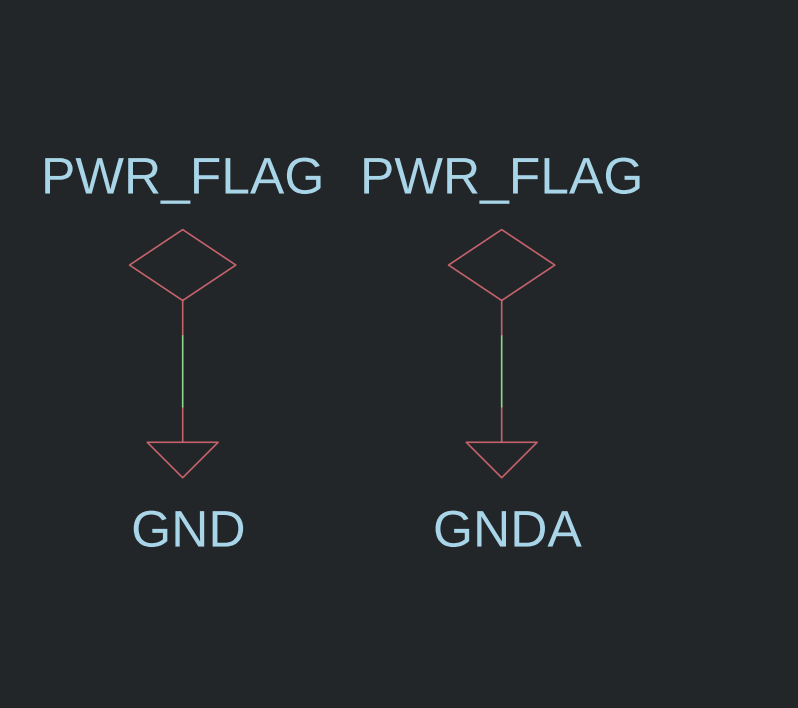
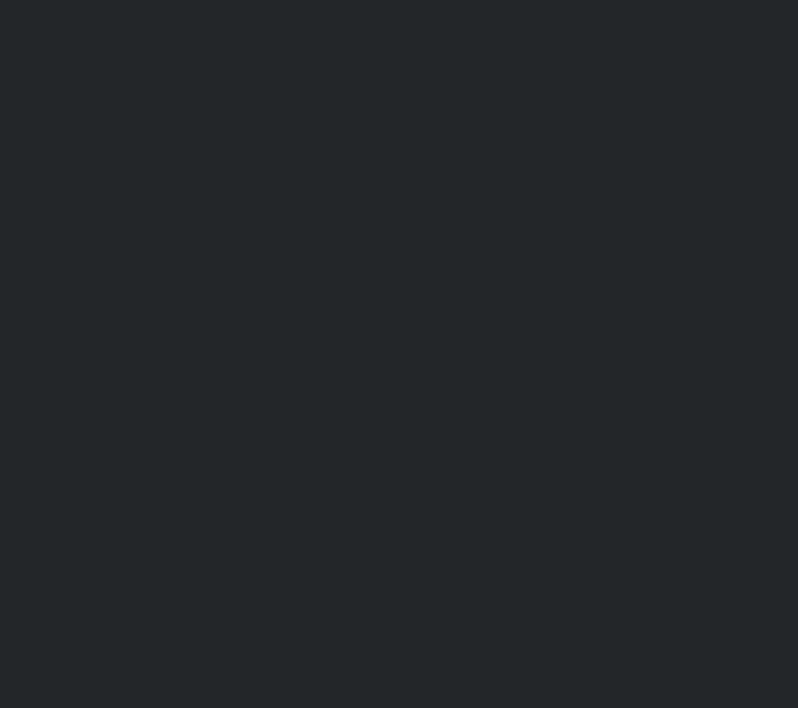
power symbol: PWR_FLAG (182, 282) -> none
power symbol: PWR_FLAG (501, 282) -> none
wire: (182, 335) (182, 406) -> none
wire: (501, 335) (501, 406) -> none
power symbol: GND (182, 442) -> none
power symbol: GNDA (501, 442) -> none

